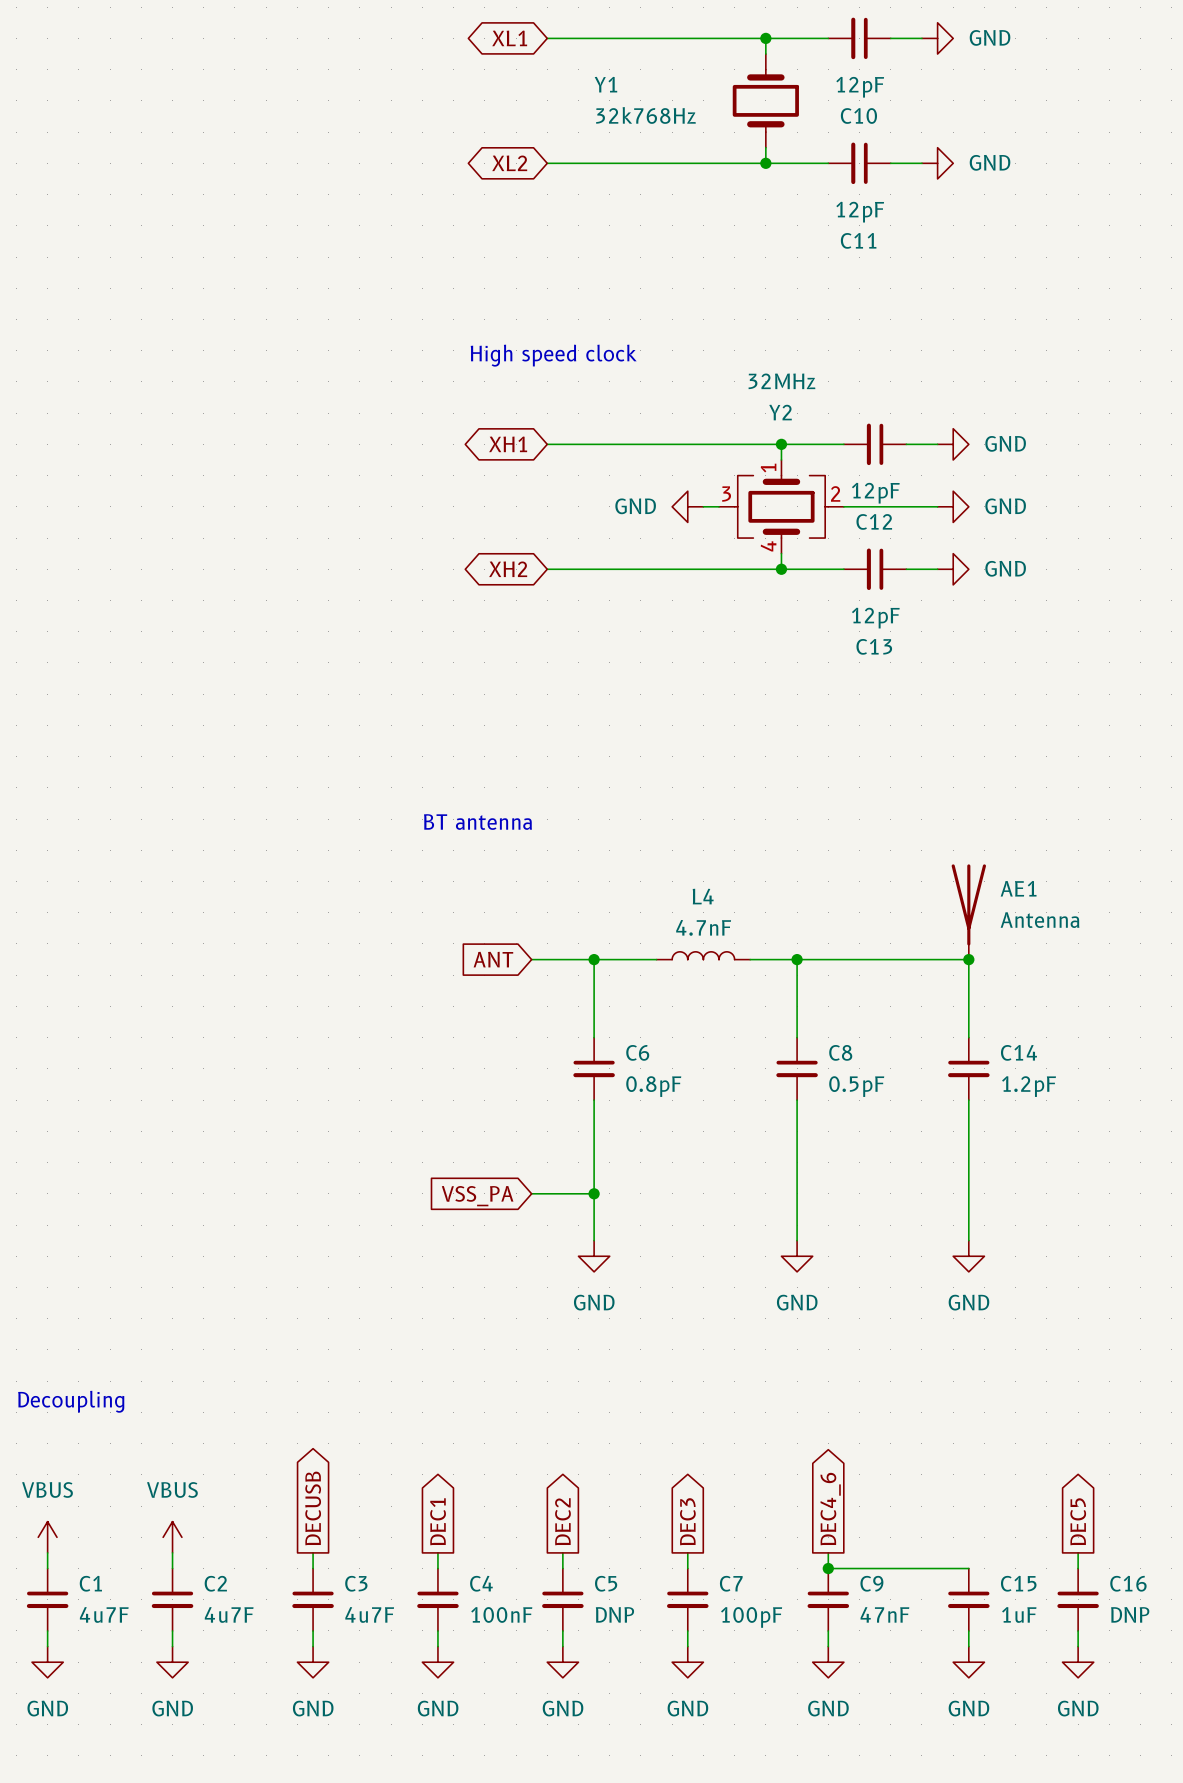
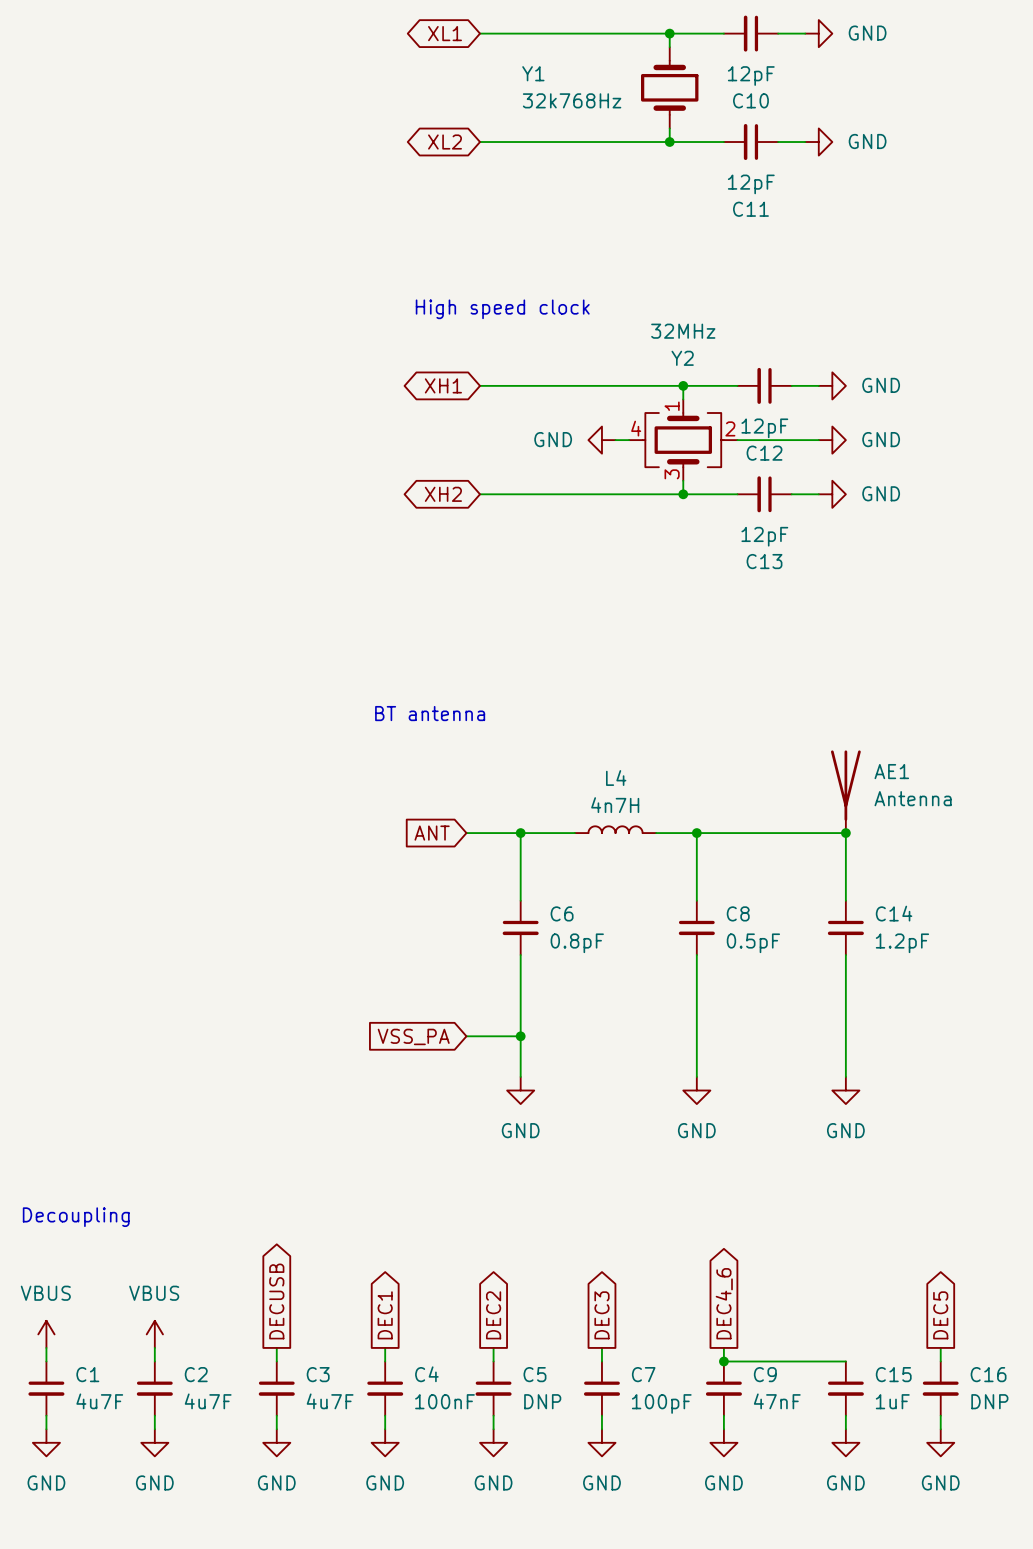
Y2 pin number: 3 (726, 494) -> 4 (636, 428)
Y2 pin number: 4 (768, 546) -> 3 (672, 474)
L4 value: 4.7nF (703, 927) -> 4n7H (615, 805)

